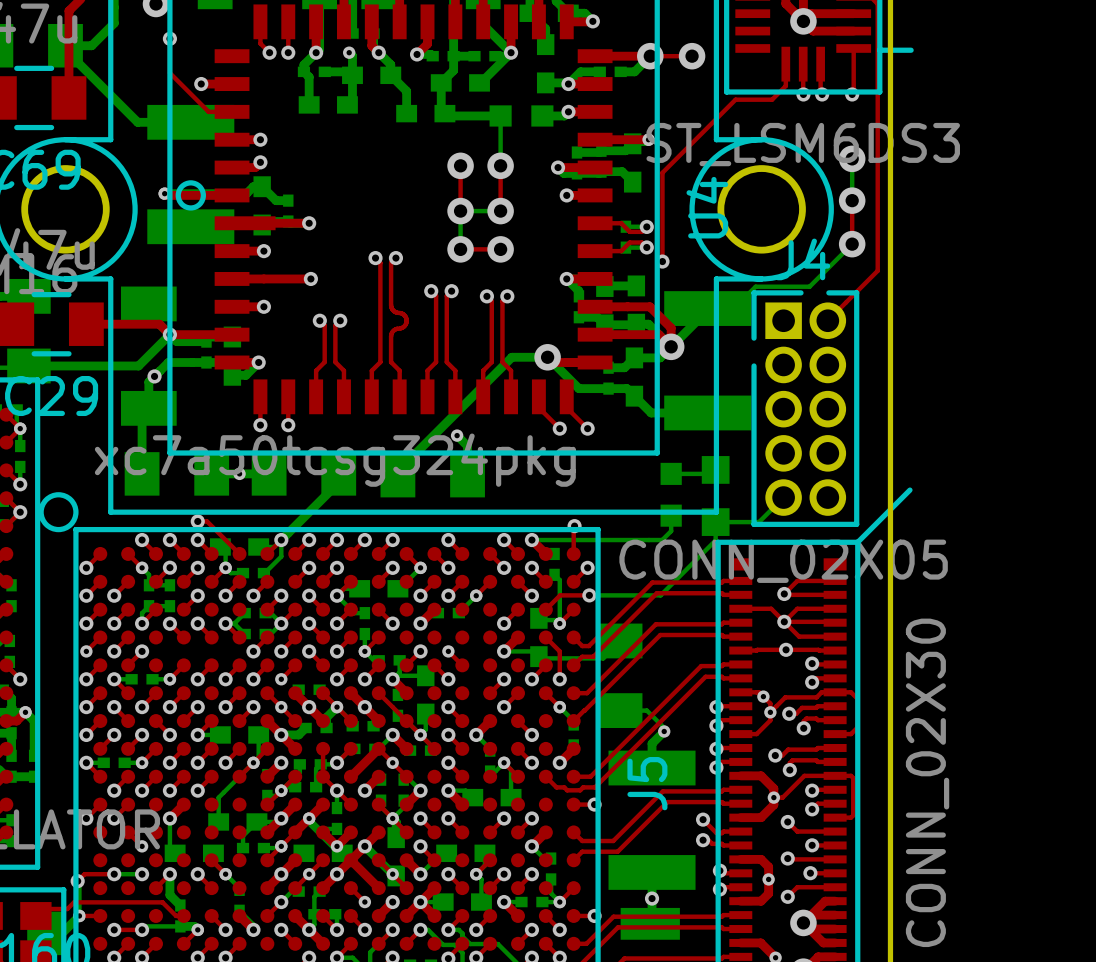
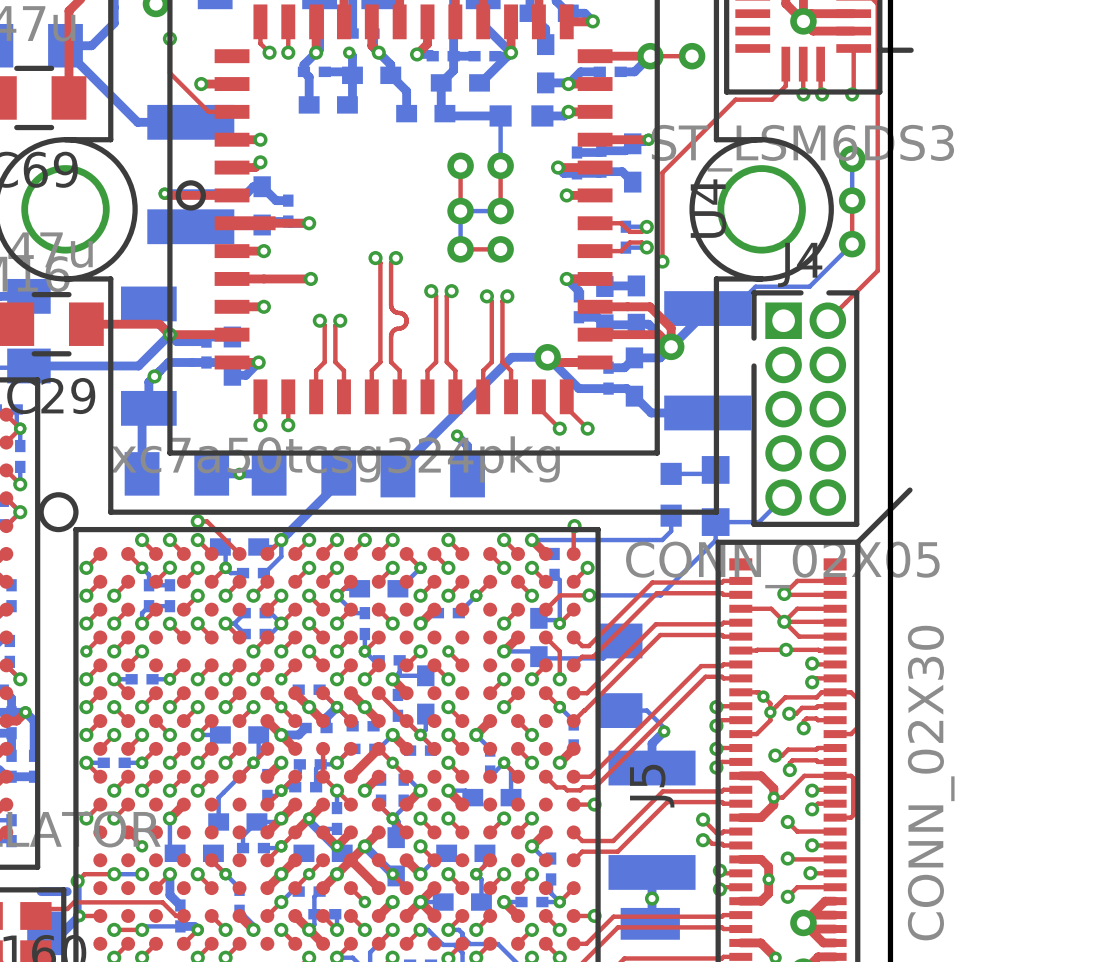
bottom track: none -> (41, 891) (67, 891)

